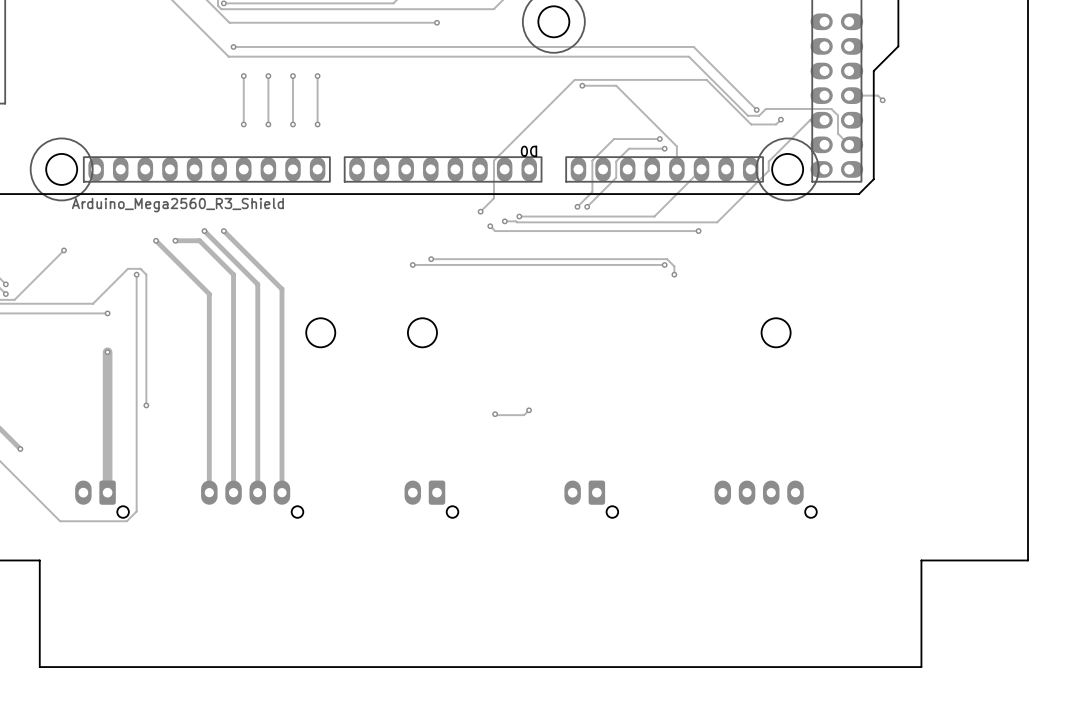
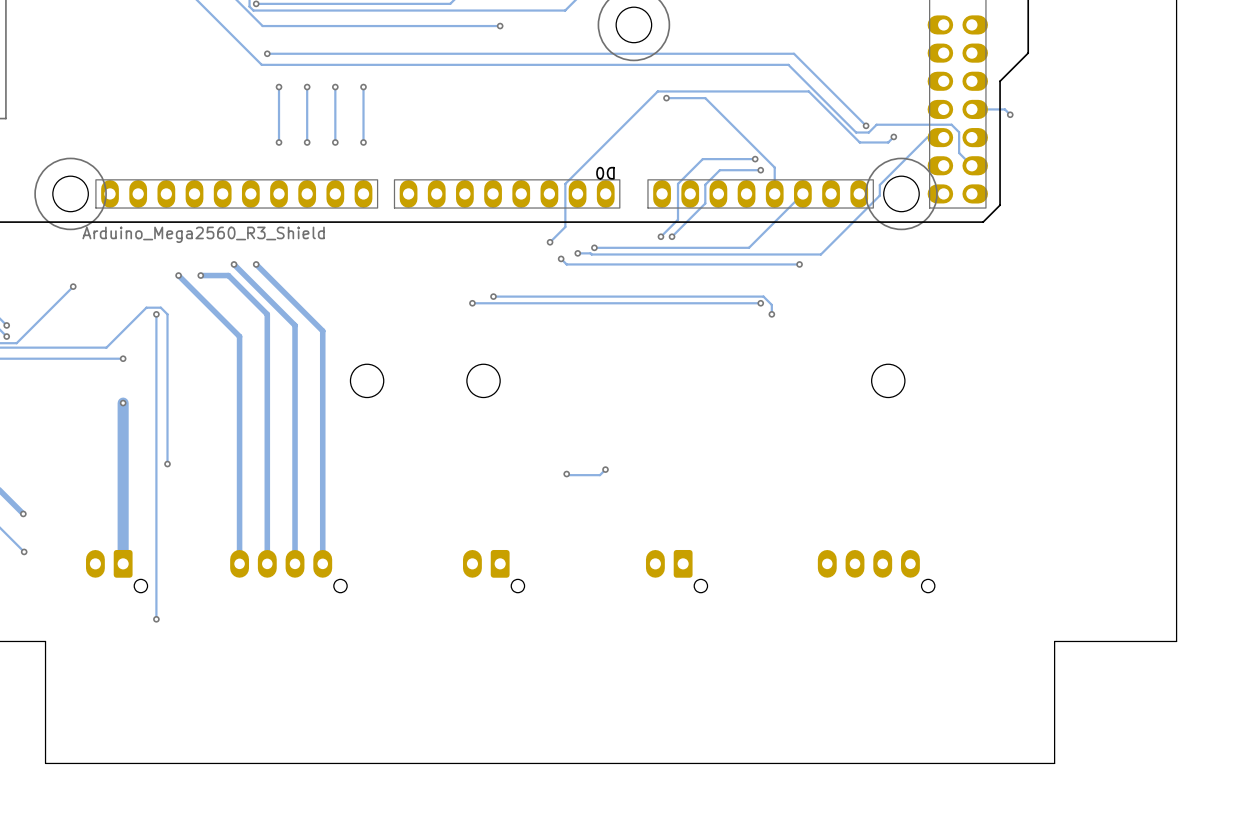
track: (21, 482) (60, 521) (126, 521) (136, 511) -> (156, 619) (156, 585)
via: none -> (24, 551)
via: none -> (156, 619)

